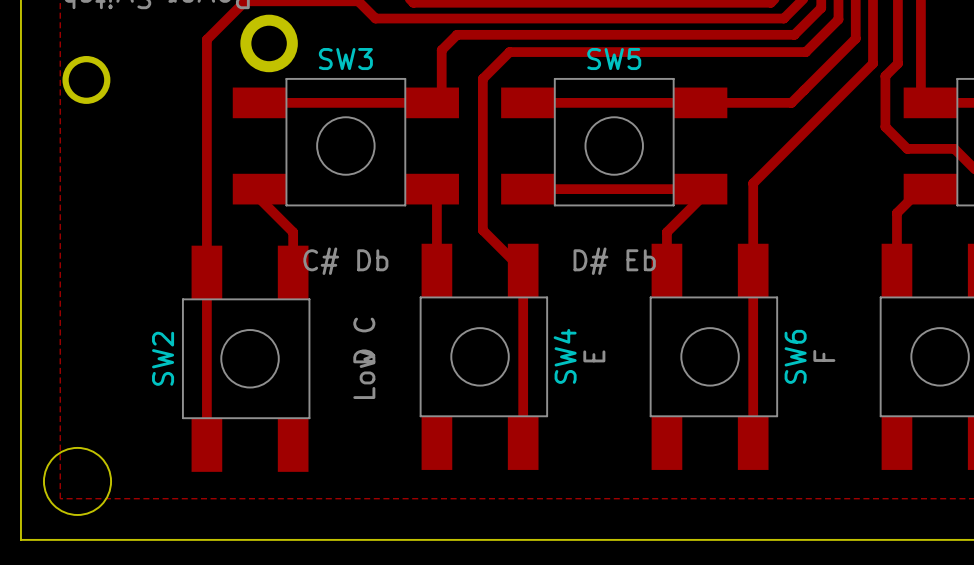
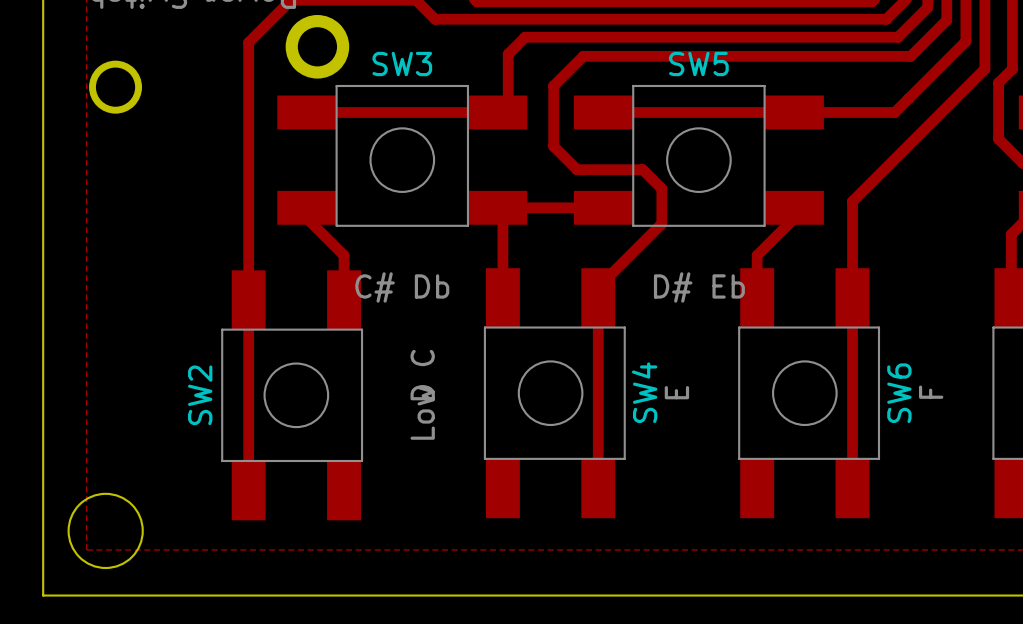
track: (482, 133) (482, 230) (523, 270) -> (553, 146) (577, 169) (642, 169) (661, 188) (661, 223) (598, 287) (598, 297)
track: none -> (508, 207) (592, 207)
track: (527, 189) (700, 189) -> none

